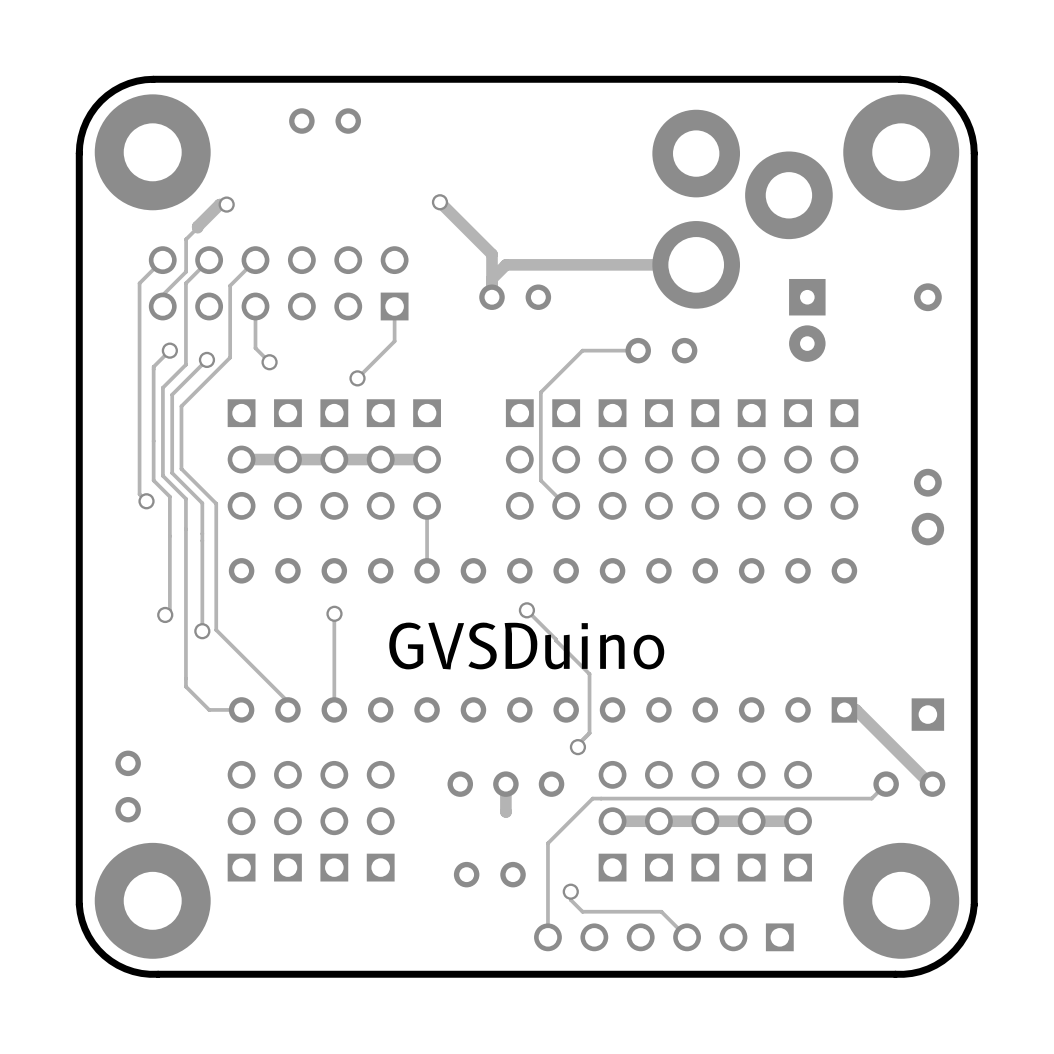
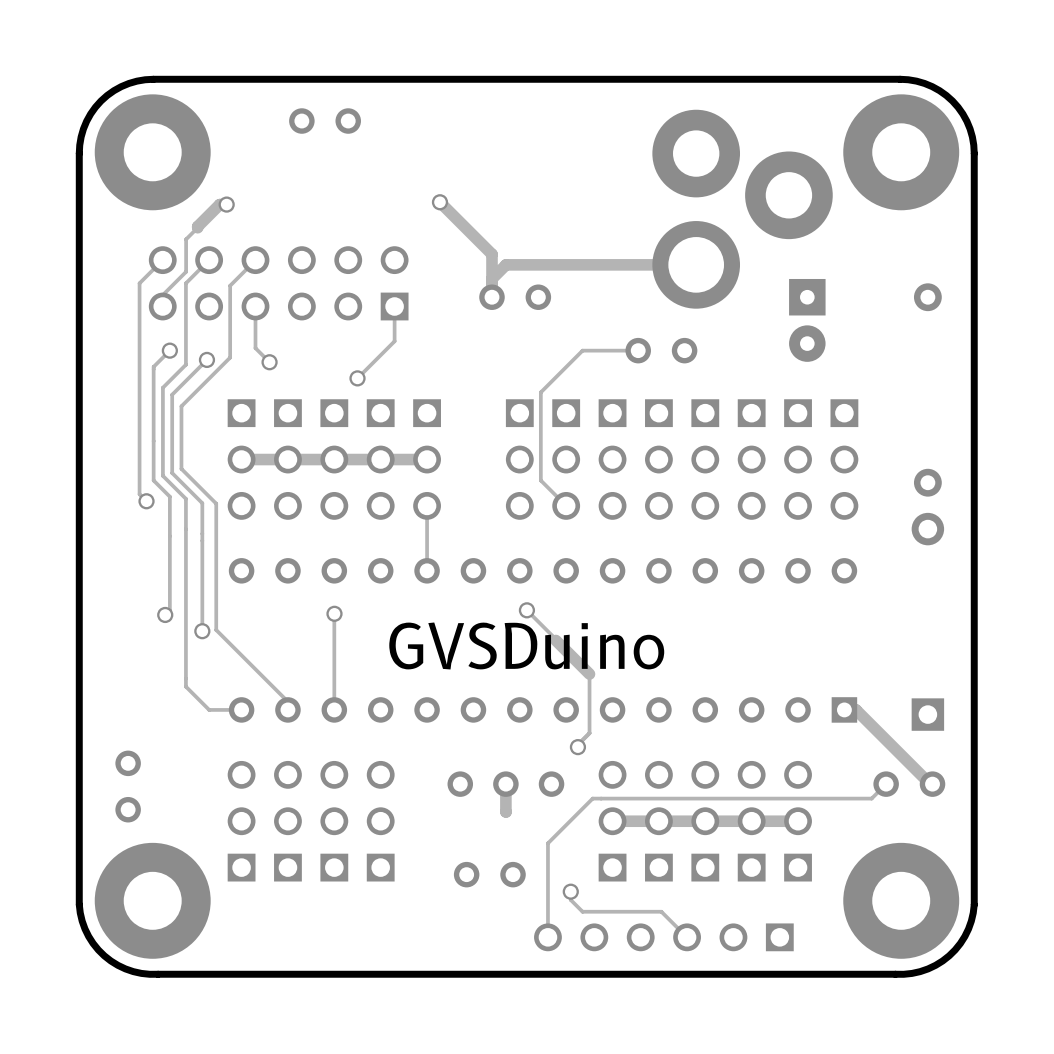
track width: thin (555, 640) (589, 674) -> thick (555, 640) (589, 674)

